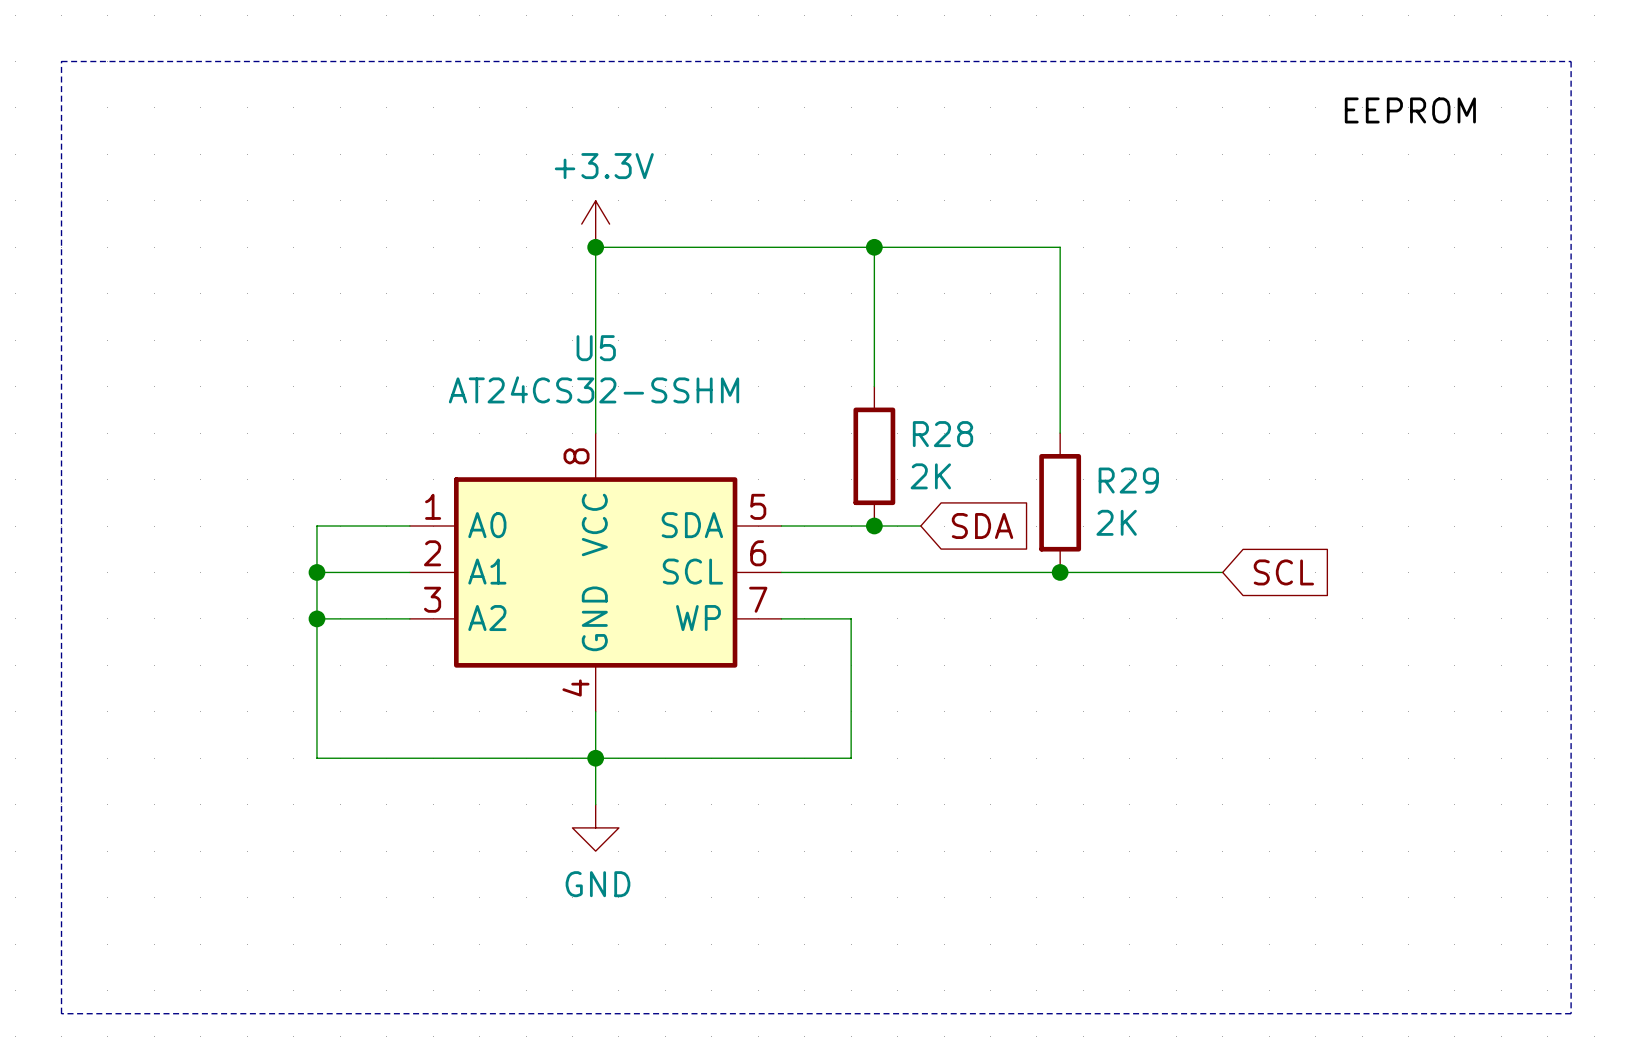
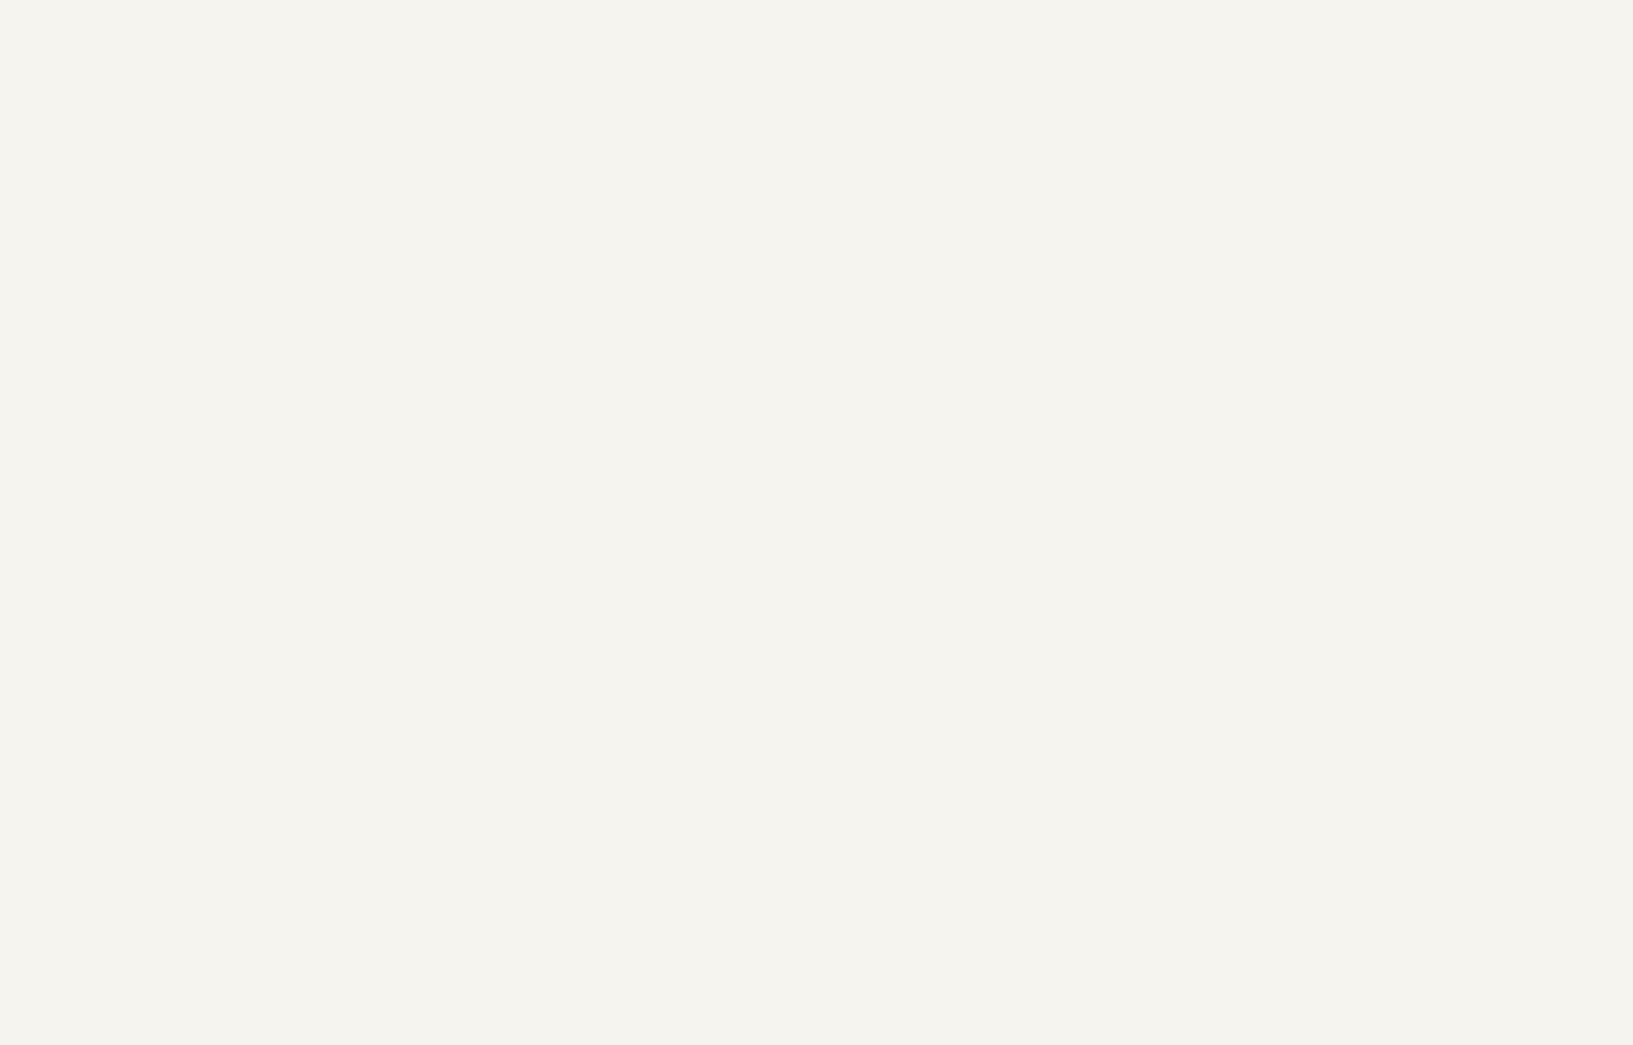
line: (61, 61) (1571, 61) (1571, 1013) (61, 1013) (61, 61) -> none
label: EEPROM (1410, 110) -> none
power symbol: +3.3V (595, 224) -> none
junction: (595, 247) -> none
wire: (874, 247) (874, 386) -> none
junction: (874, 247) -> none
wire: (595, 433) (595, 247) (1060, 247) (1060, 433) -> none
R28: 2K (874, 456) -> none
R29: 2K (1060, 502) -> none
wire: (409, 526) (316, 526) (316, 758) (851, 758) (851, 618) (781, 618) -> none
wire: (781, 526) (920, 526) -> none
junction: (874, 526) -> none
global label: SDA (982, 526) -> none
wire: (316, 572) (409, 572) -> none
junction: (316, 572) -> none
U5: AT24CS32-SSHM (595, 572) -> none
wire: (781, 572) (1222, 572) -> none
junction: (1060, 572) -> none
global label: SCL (1283, 572) -> none
wire: (316, 618) (409, 618) -> none
junction: (316, 618) -> none
wire: (595, 711) (595, 804) -> none
junction: (595, 758) -> none
power symbol: GND (595, 827) -> none

